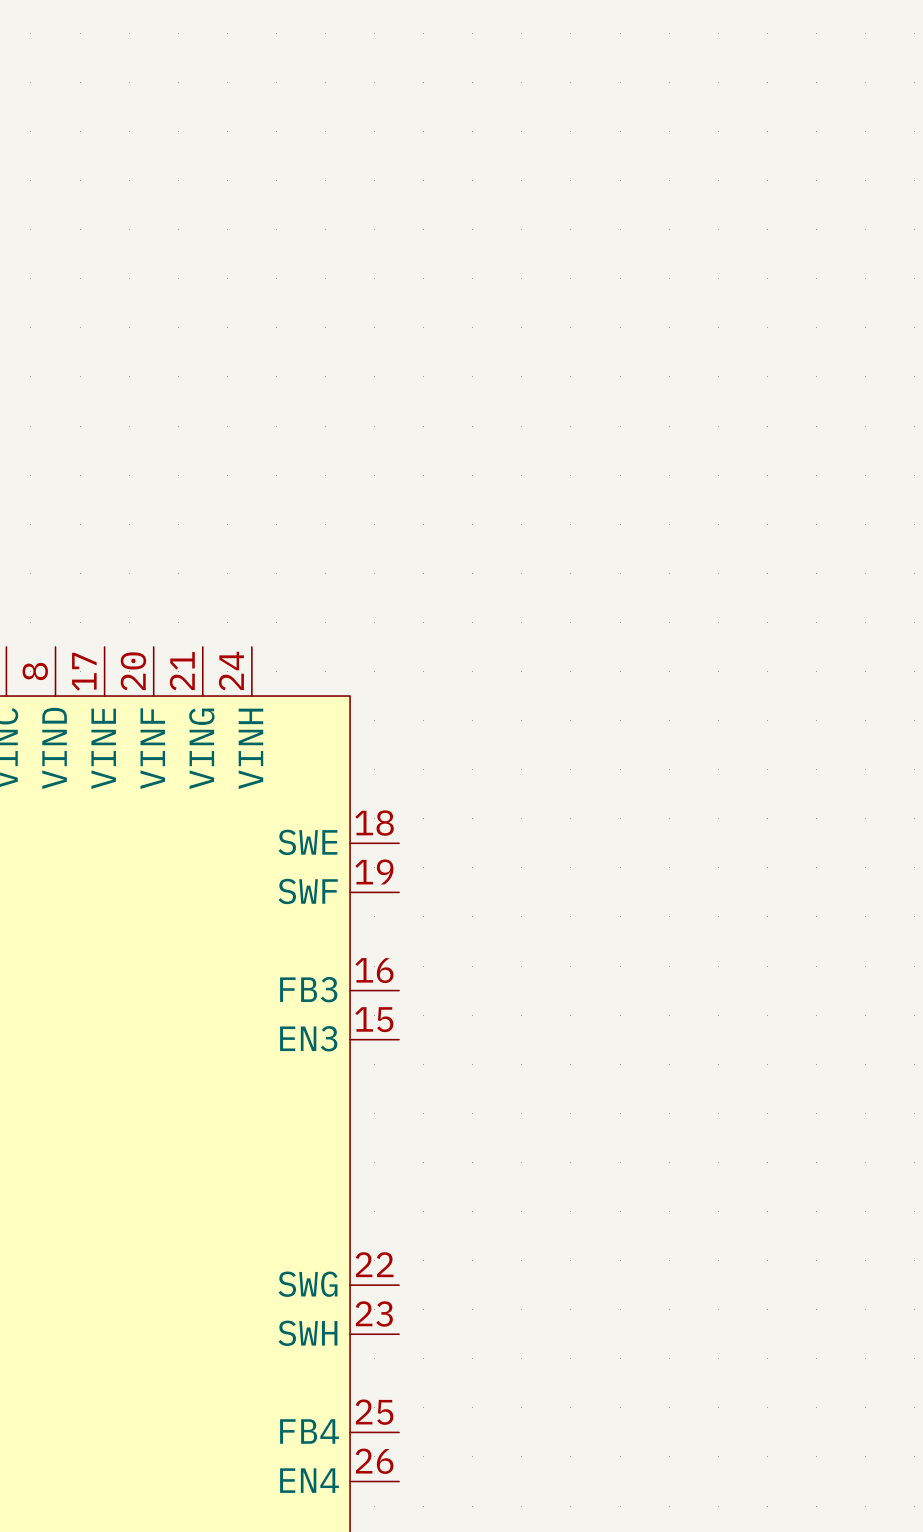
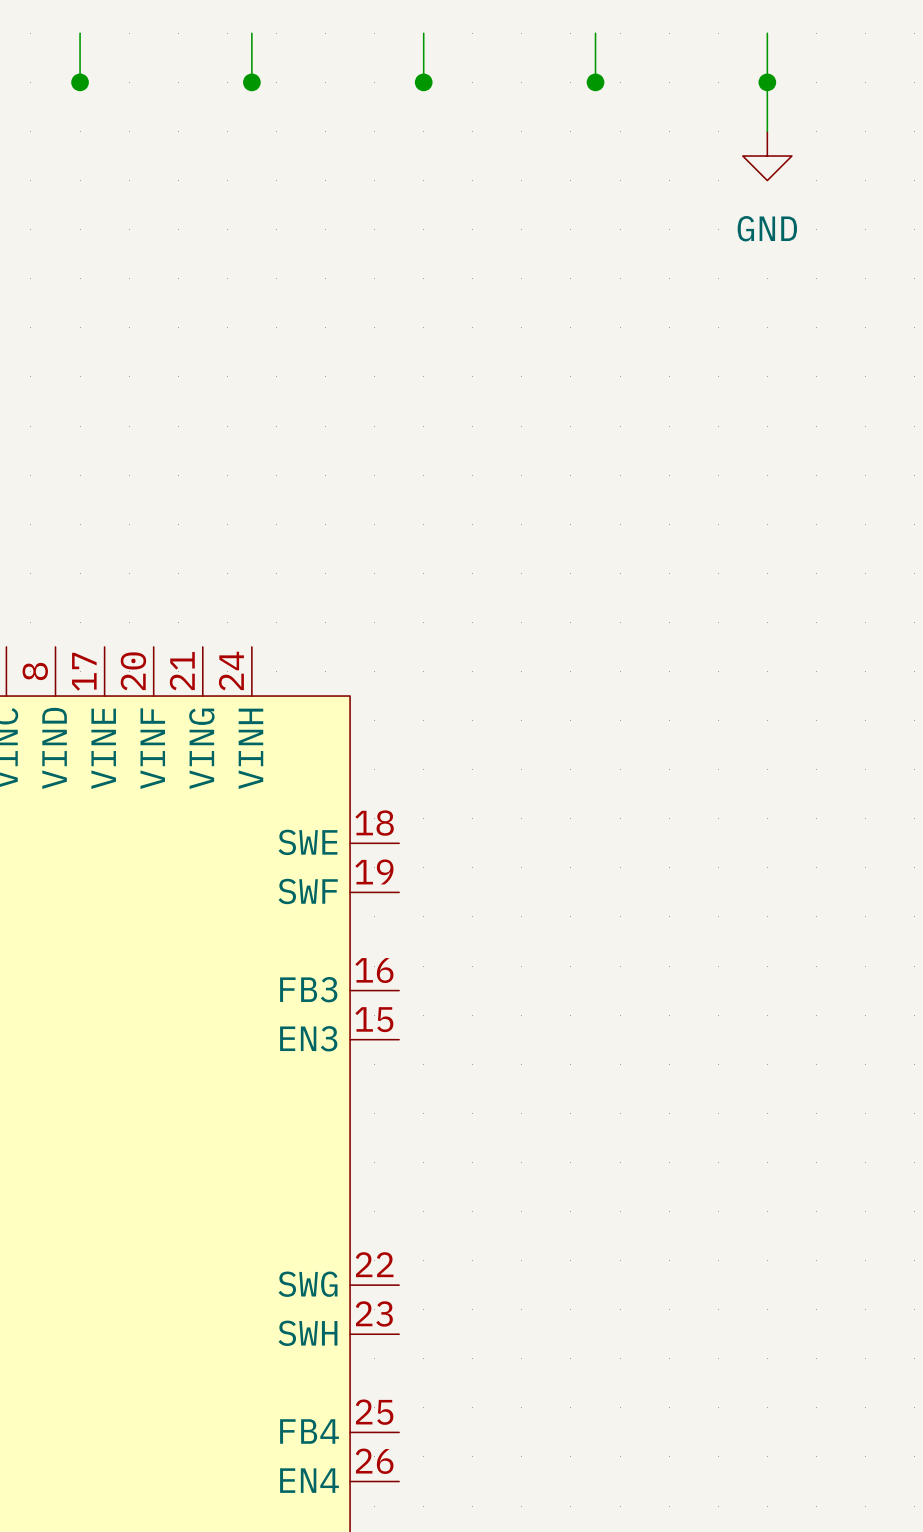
wire: none -> (80, 33) (80, 82)
wire: none -> (251, 33) (251, 82)
wire: none -> (423, 33) (423, 82)
wire: none -> (595, 33) (595, 82)
wire: none -> (767, 33) (767, 131)
junction: none -> (80, 82)
junction: none -> (251, 82)
junction: none -> (423, 82)
junction: none -> (595, 82)
junction: none -> (767, 82)
power symbol: none -> GND (767, 156)

